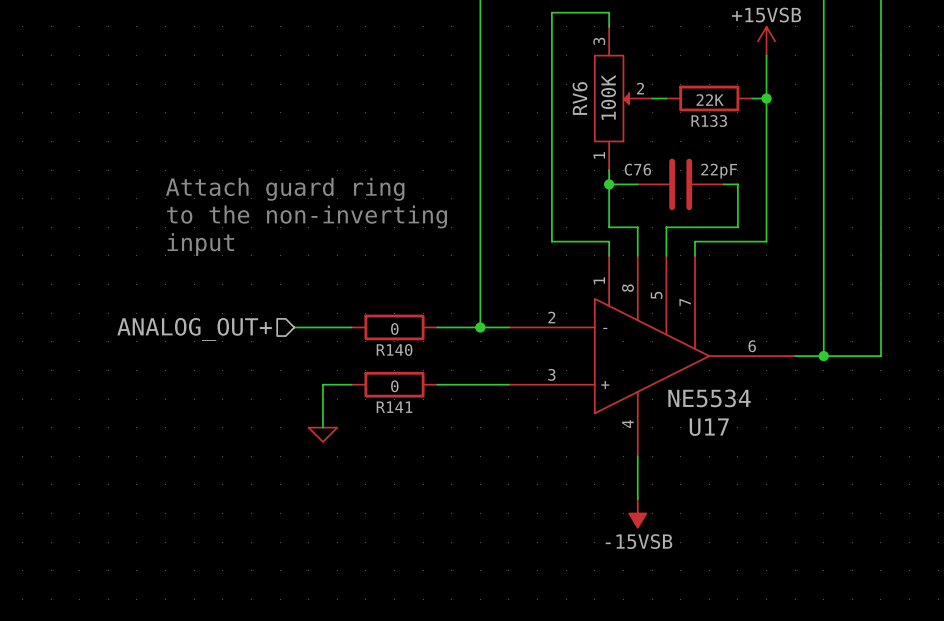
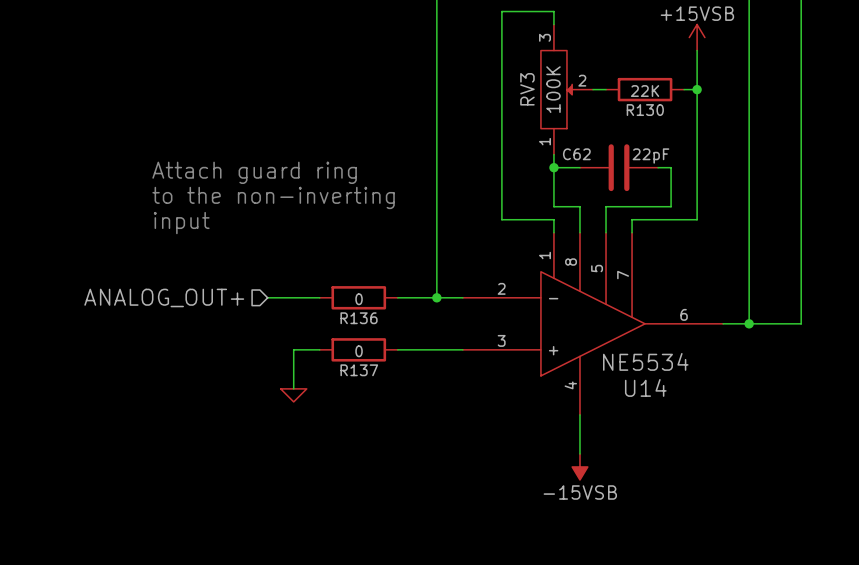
RV6 name: RV6 (580, 98) -> RV3 (527, 89)
R133 name: R133 (709, 121) -> R130 (645, 110)
C76 name: C76 (637, 169) -> C62 (576, 154)
R140 name: R140 (394, 349) -> R136 (359, 318)
R141 name: R141 (394, 407) -> R137 (359, 370)
U17 name: U17 (709, 427) -> U14 (645, 387)

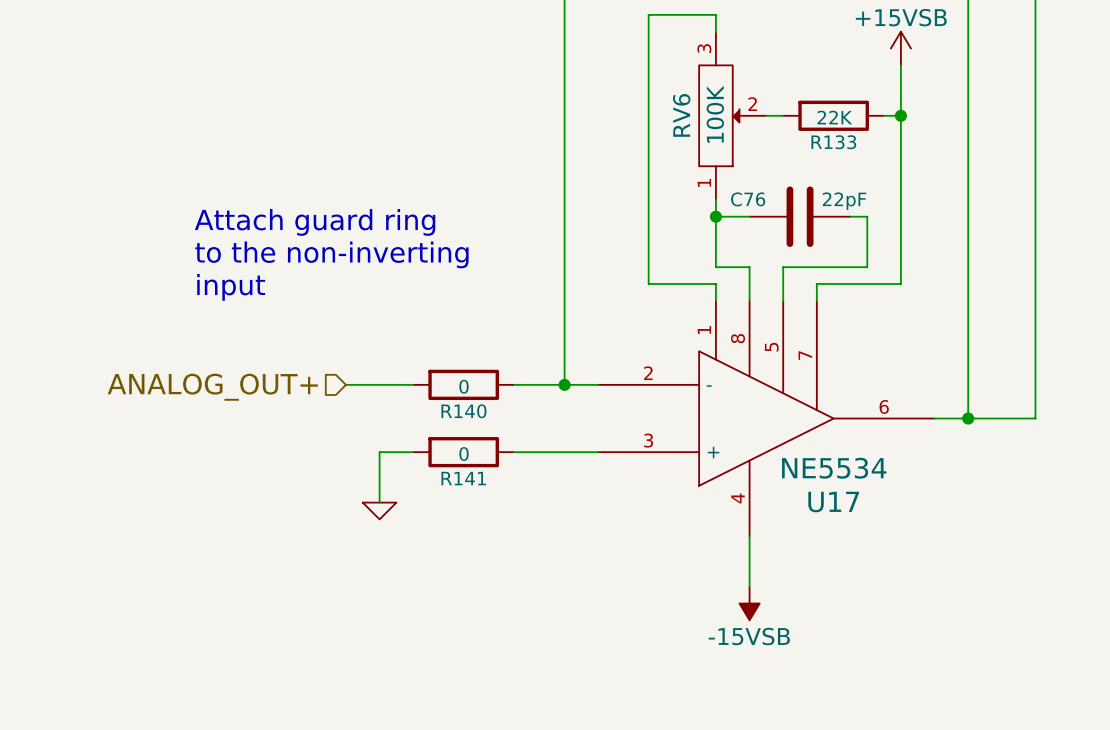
RV3 name: RV3 (527, 89) -> RV6 (681, 115)
R130 name: R130 (645, 110) -> R133 (833, 142)
C62 name: C62 (576, 154) -> C76 (748, 199)
R136 name: R136 (359, 318) -> R140 (463, 411)
R137 name: R137 (359, 370) -> R141 (463, 478)
U14 name: U14 (645, 387) -> U17 (833, 502)

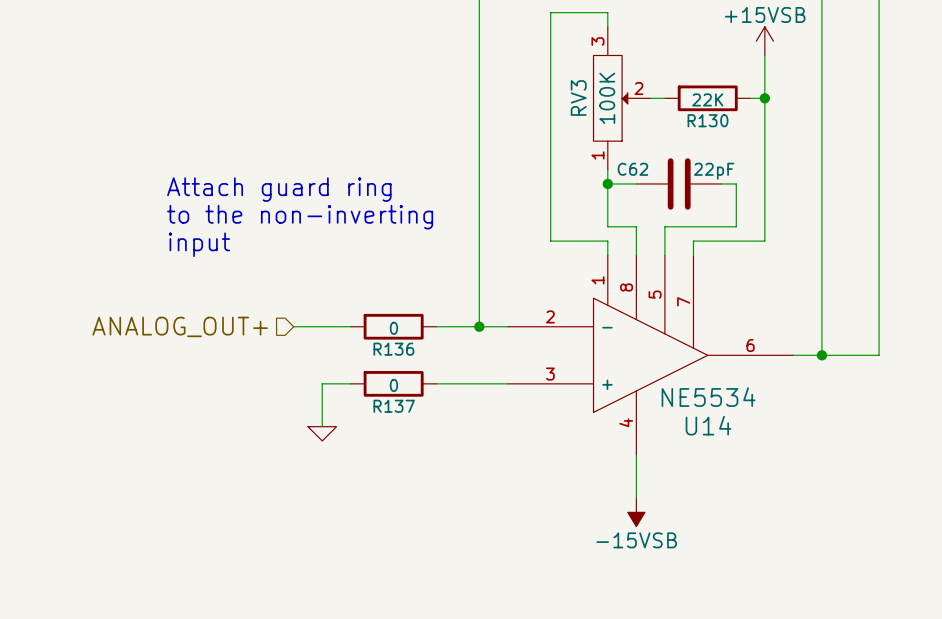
RV6 name: RV6 (681, 115) -> RV3 (578, 97)
R133 name: R133 (833, 142) -> R130 (708, 120)
C76 name: C76 (748, 199) -> C62 (632, 169)
R140 name: R140 (463, 411) -> R136 (393, 349)
R141 name: R141 (463, 478) -> R137 (394, 406)
U17 name: U17 (833, 502) -> U14 (708, 425)

